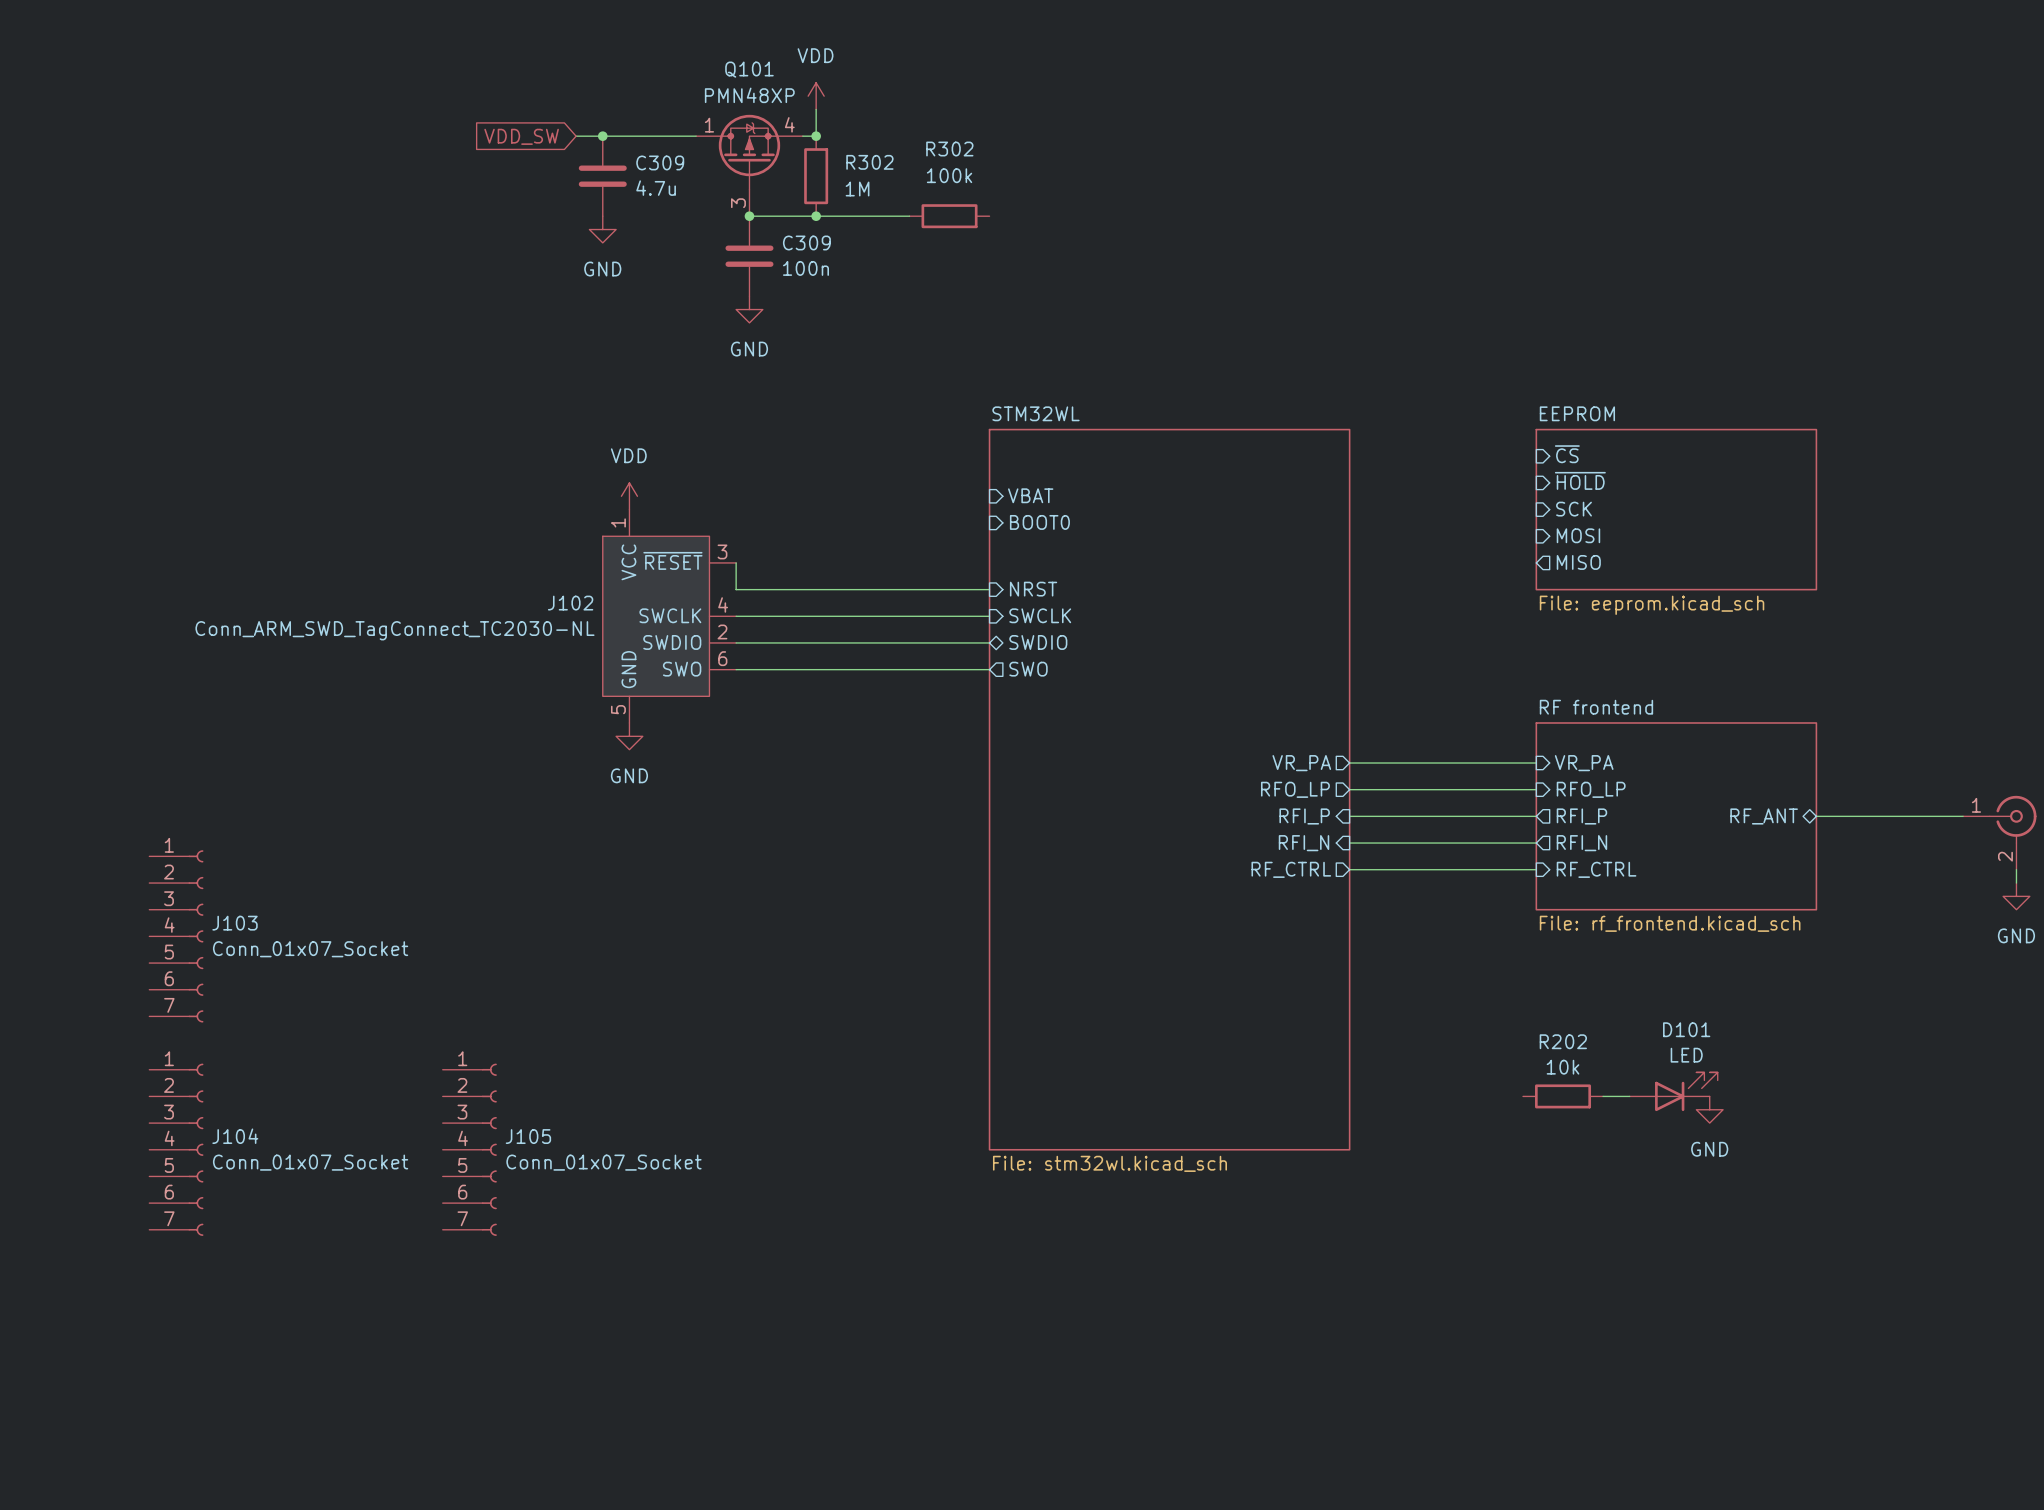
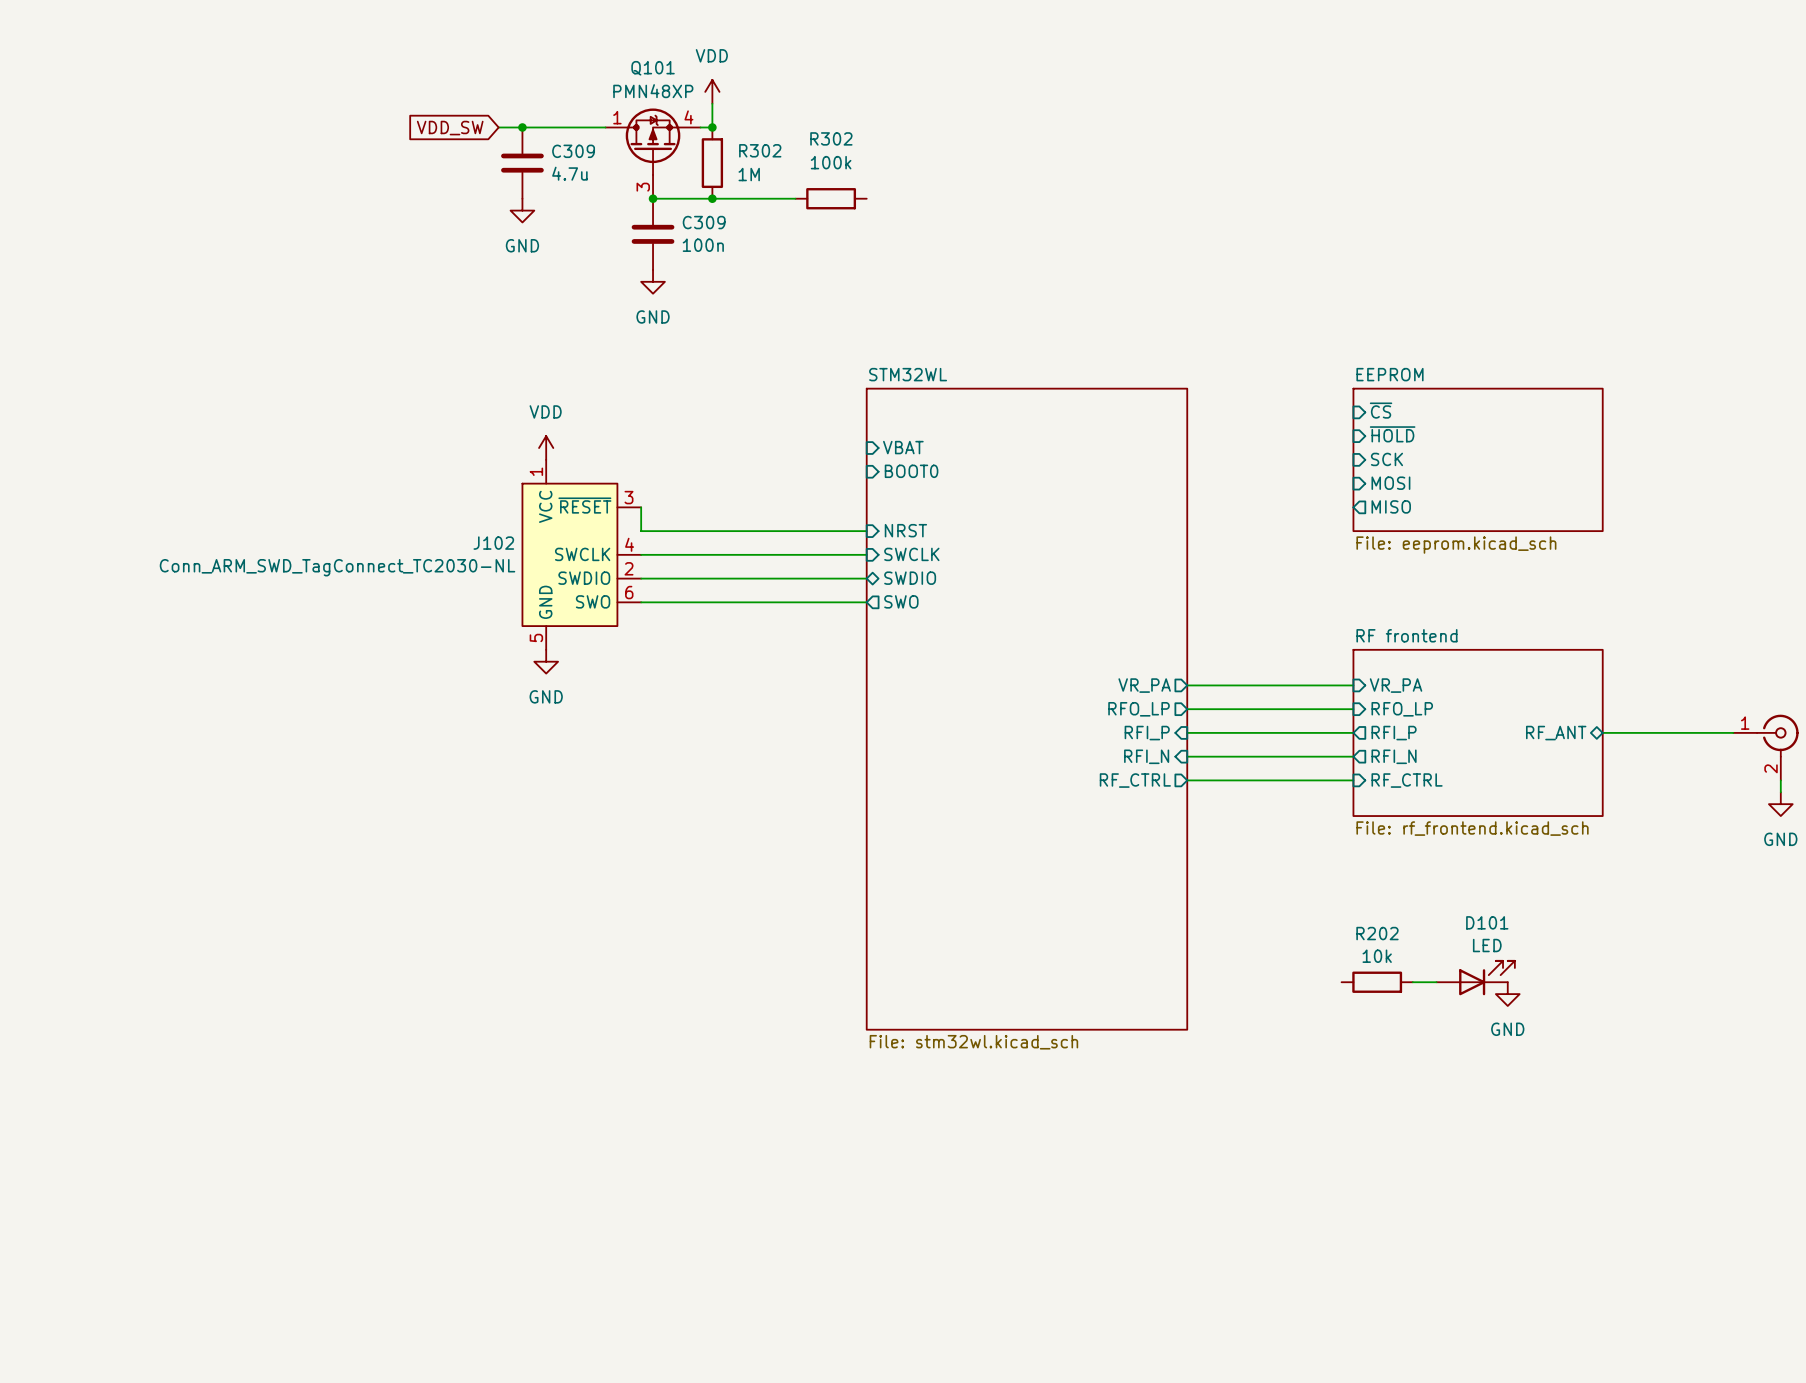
J103: Conn_01x07_Socket (176, 936) -> none
J104: Conn_01x07_Socket (176, 1149) -> none
J105: Conn_01x07_Socket (469, 1149) -> none

